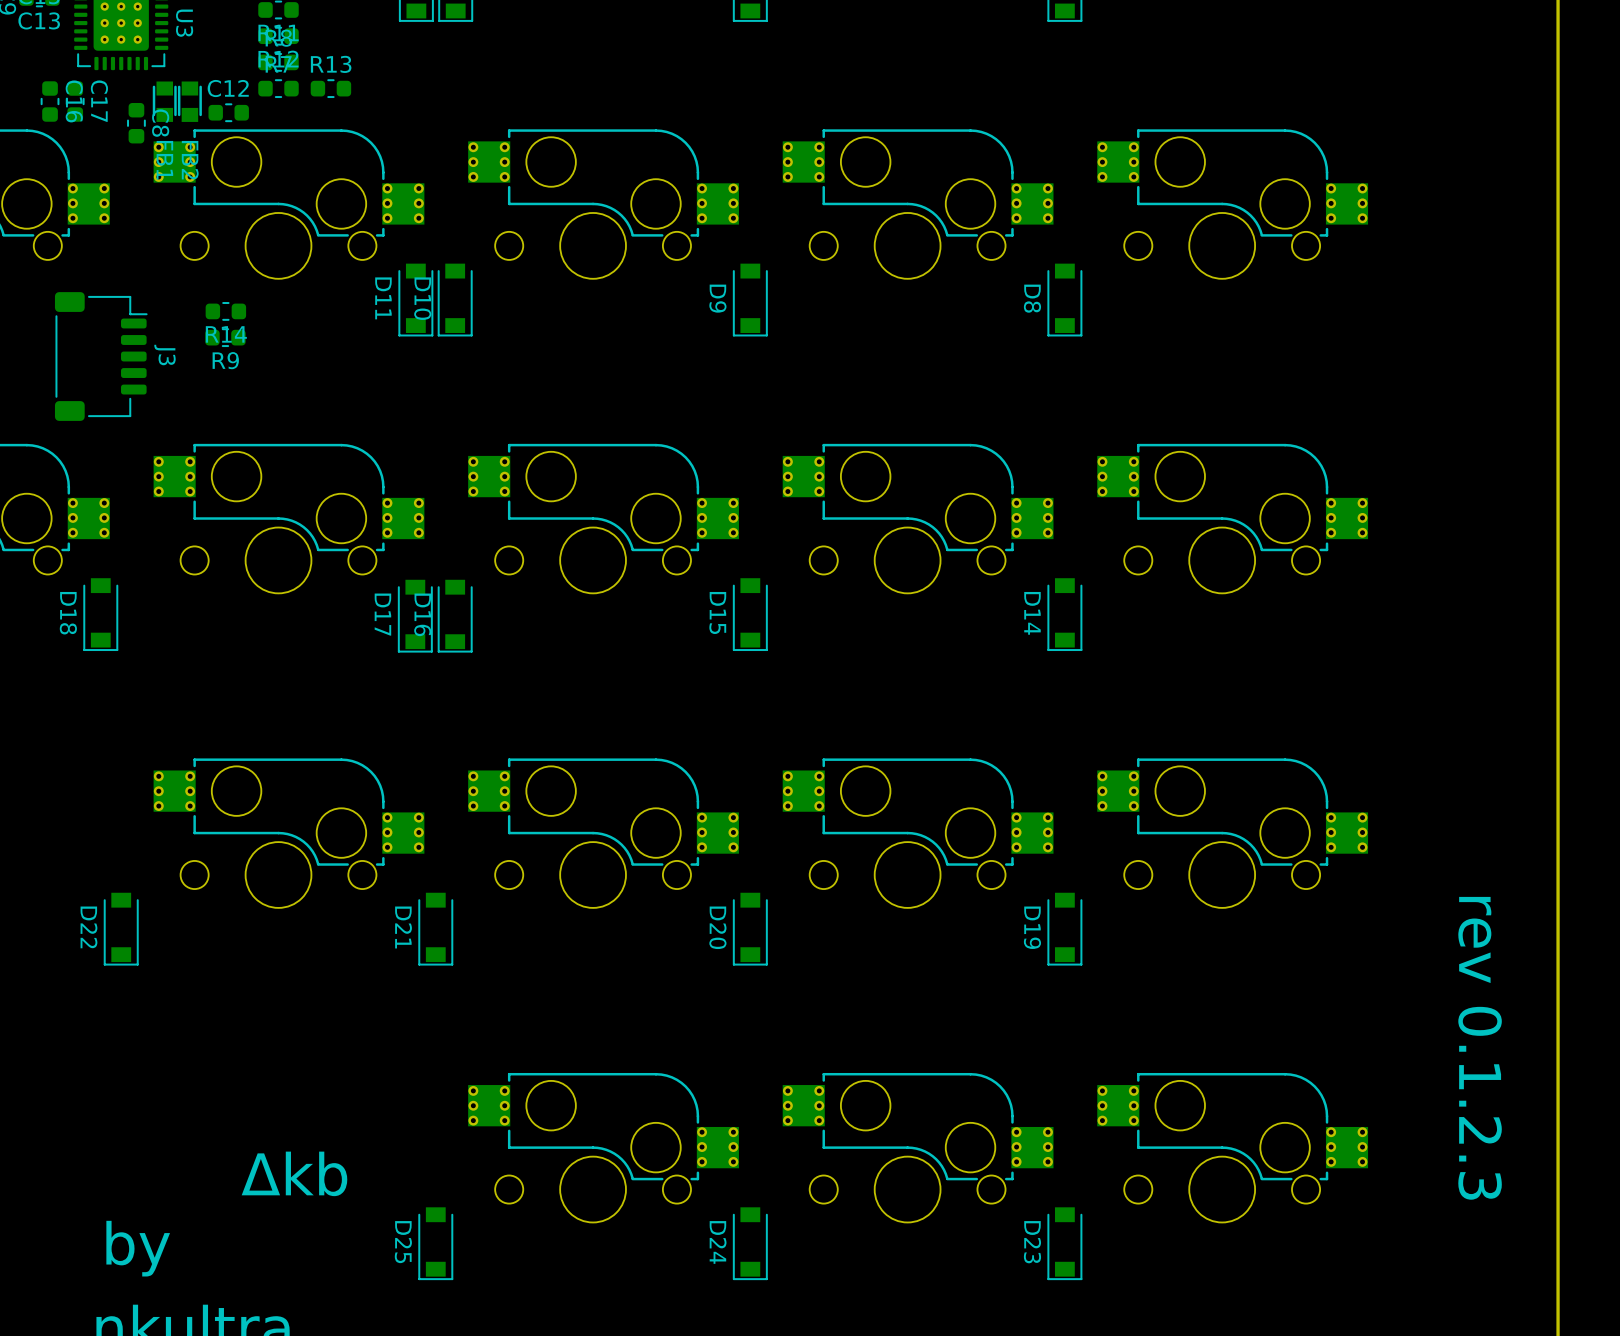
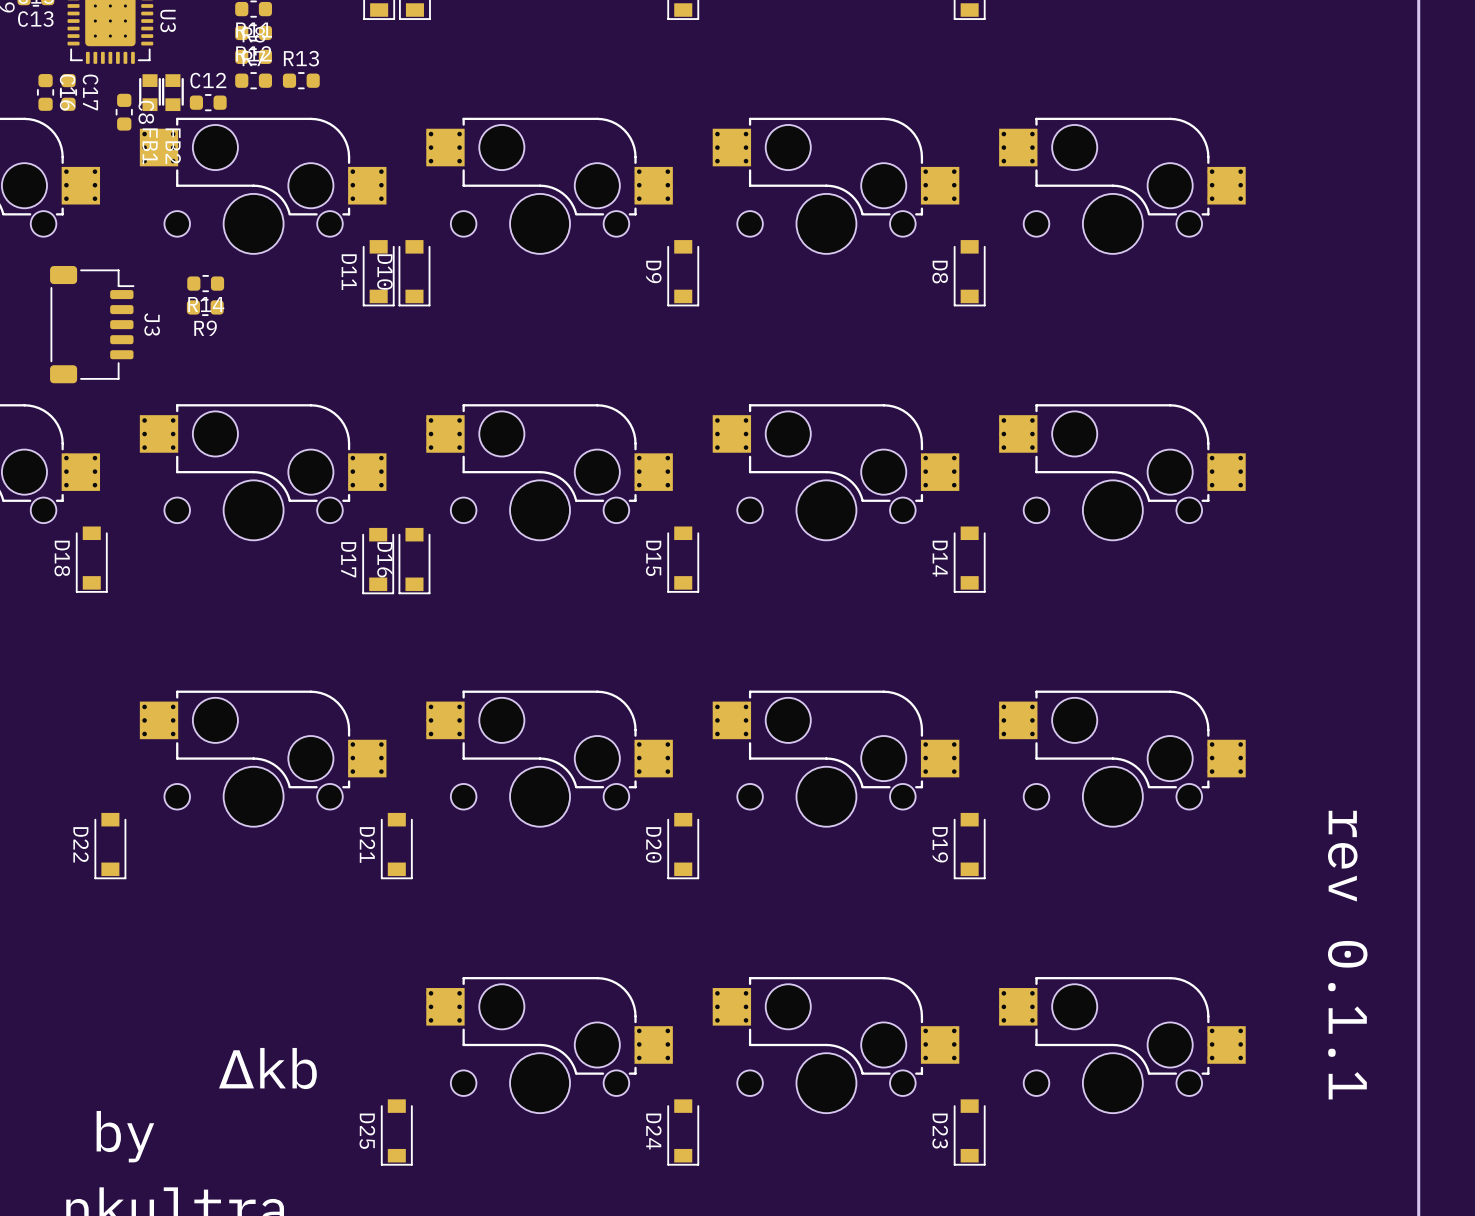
text: rev 0.1.2.3 (1480, 1048) -> rev 0.1.1 (1347, 955)

